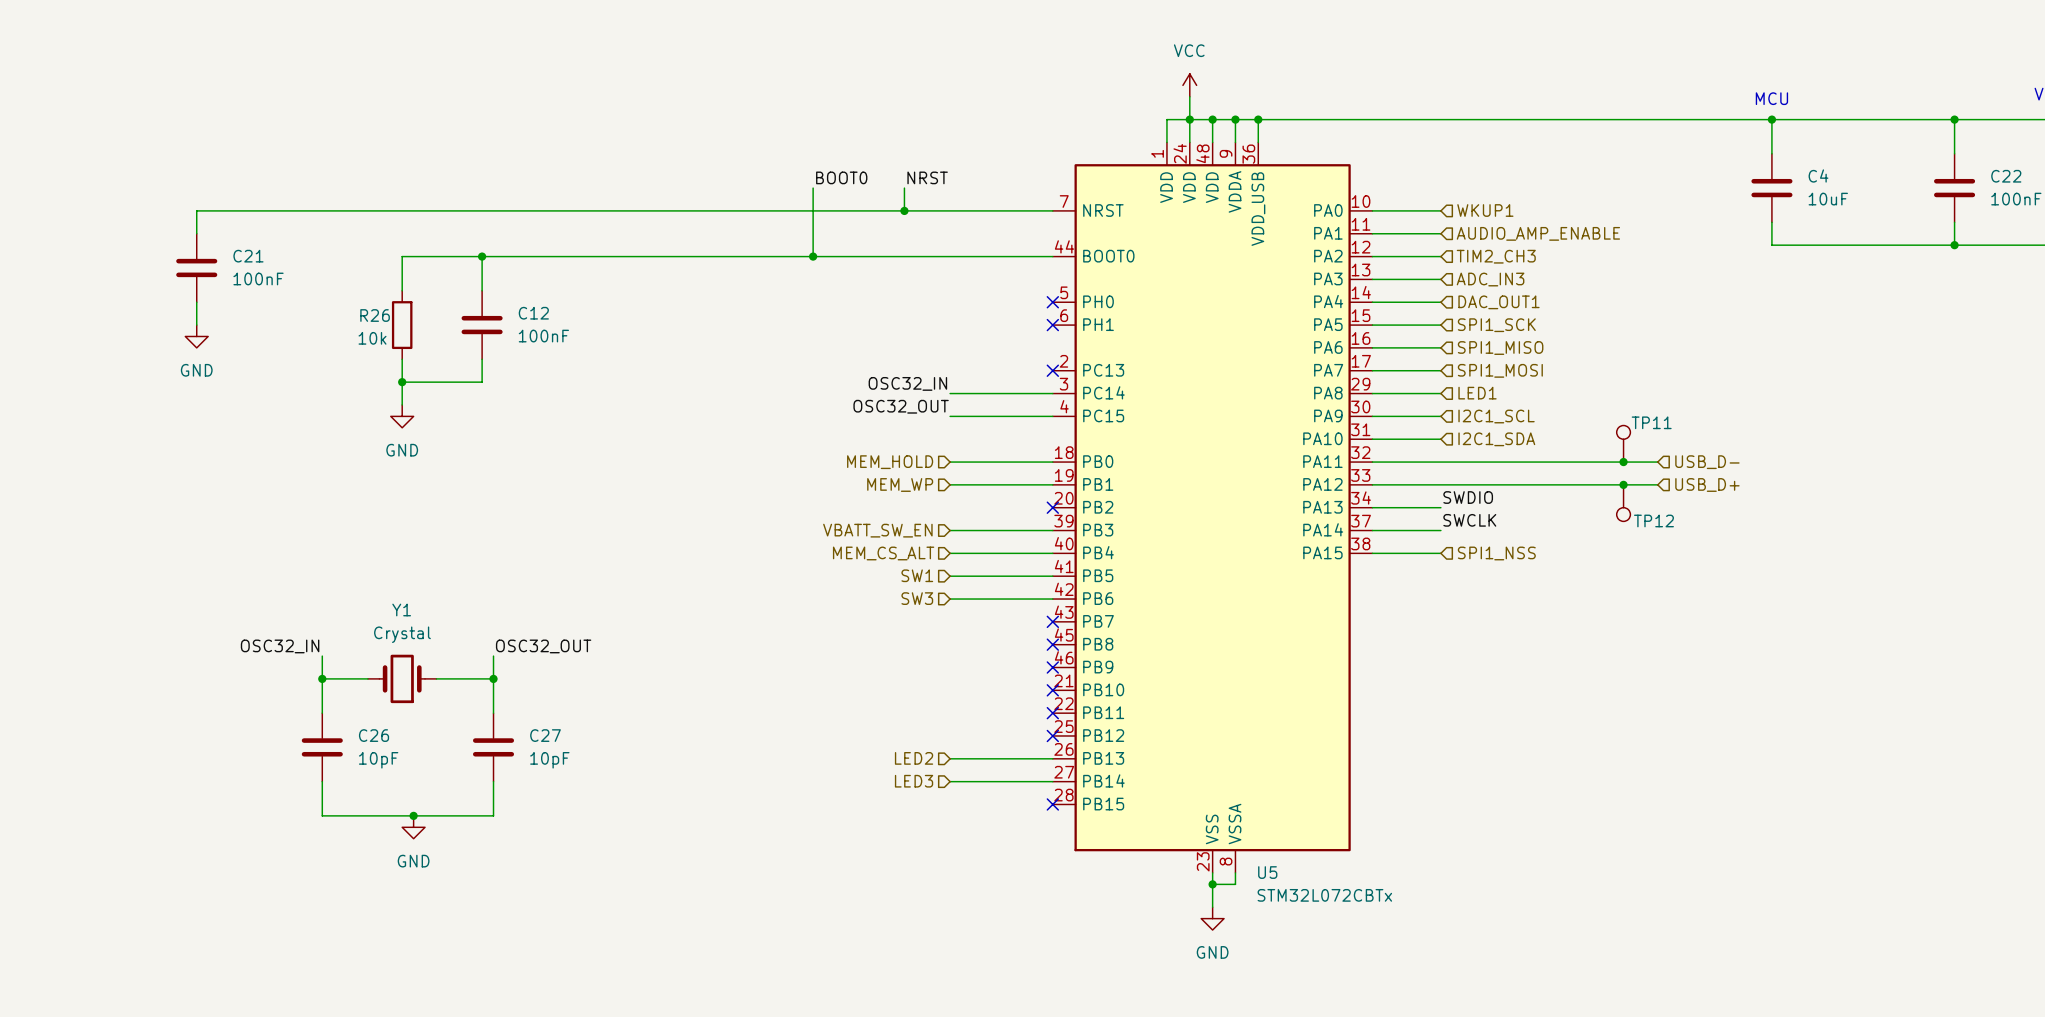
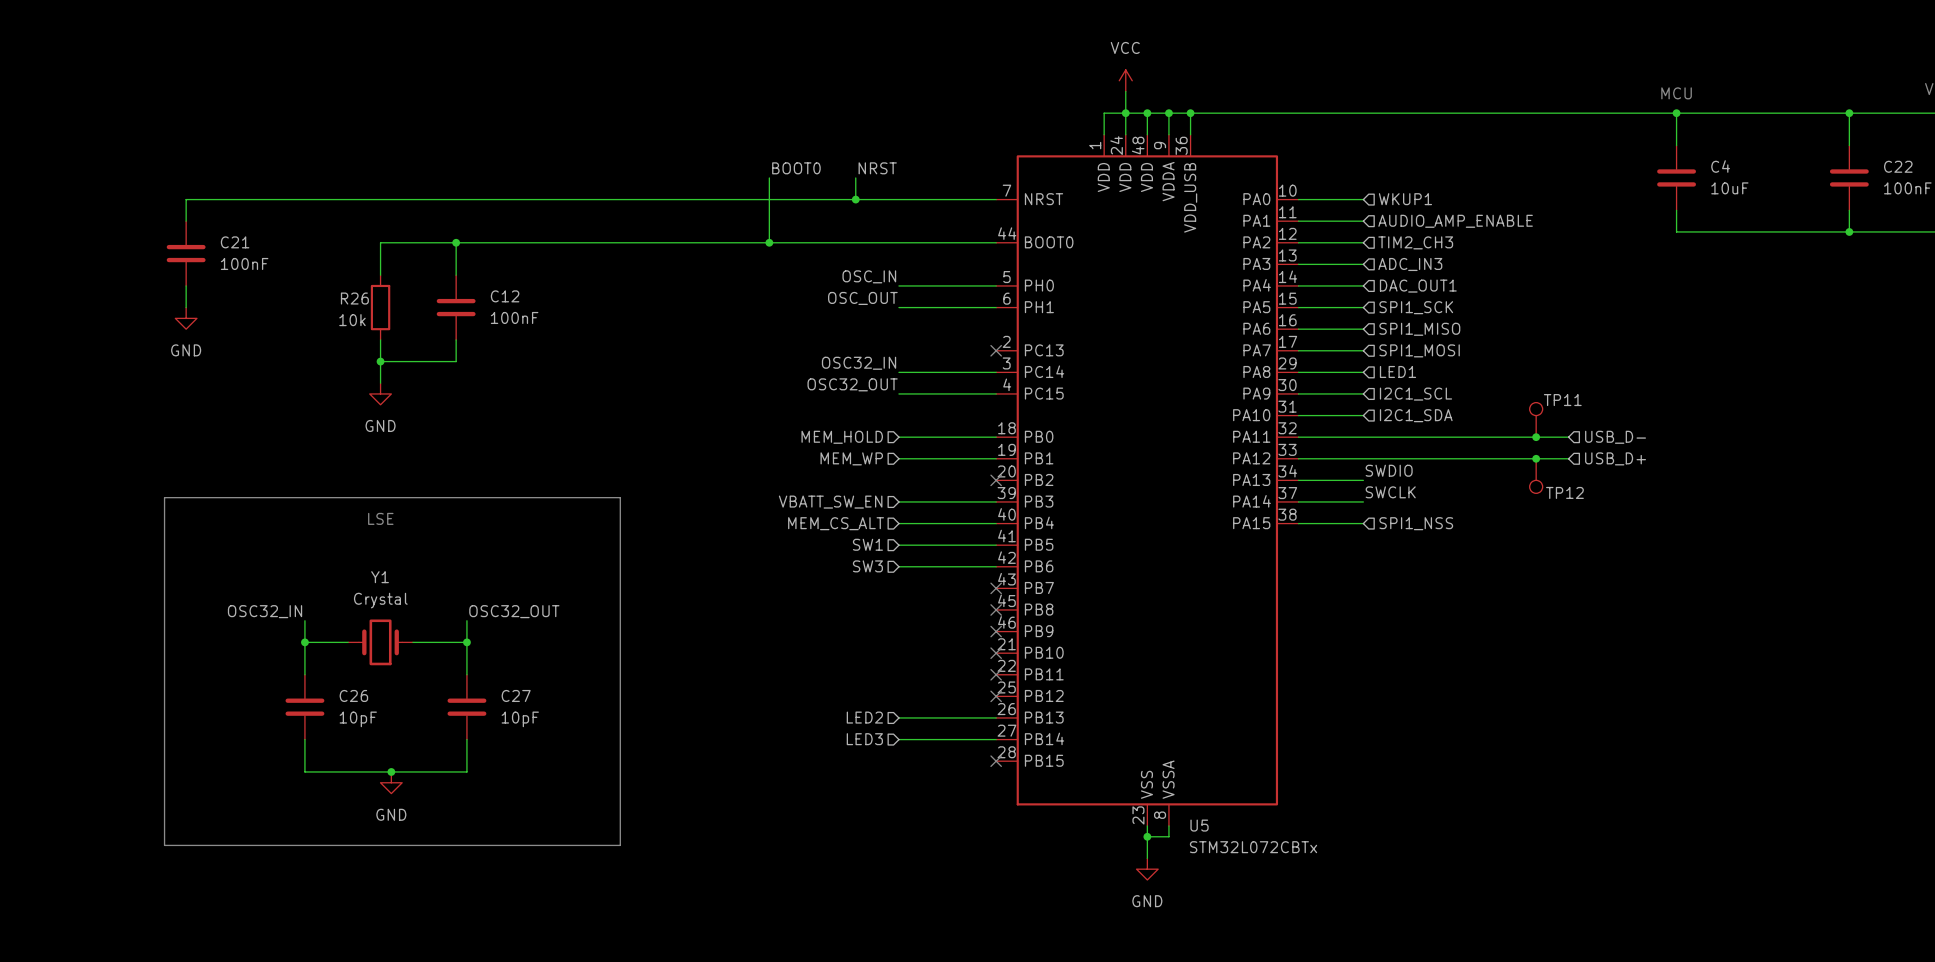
label: none -> OSC_IN (869, 276)
wire: none -> (898, 285) (996, 285)
no-connect mark: (1052, 302) -> none
label: none -> OSC_OUT (862, 298)
wire: none -> (898, 307) (996, 307)
no-connect mark: (1052, 325) -> none
line: none -> (164, 497) (620, 497) (620, 845) (164, 845) (164, 497)
text: none -> LSE (380, 518)

